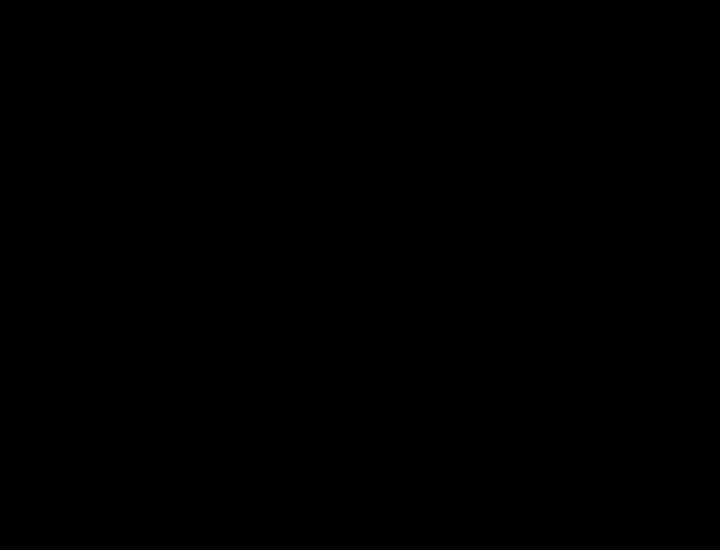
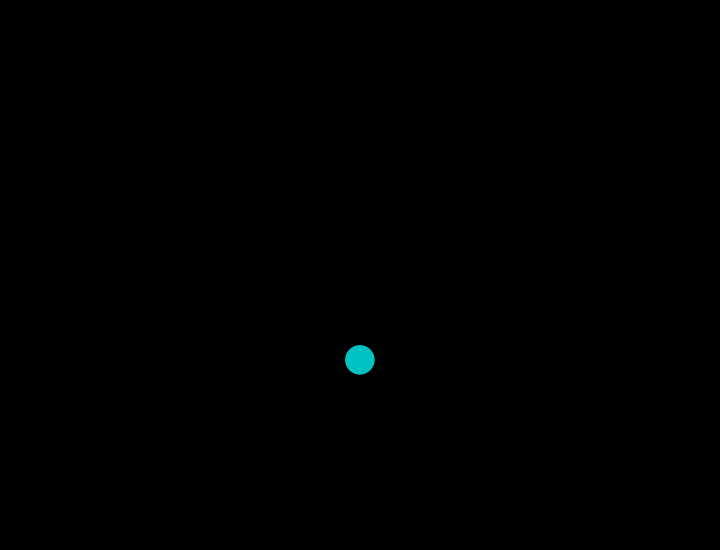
drawing: none -> [345, 345, 375, 375]

